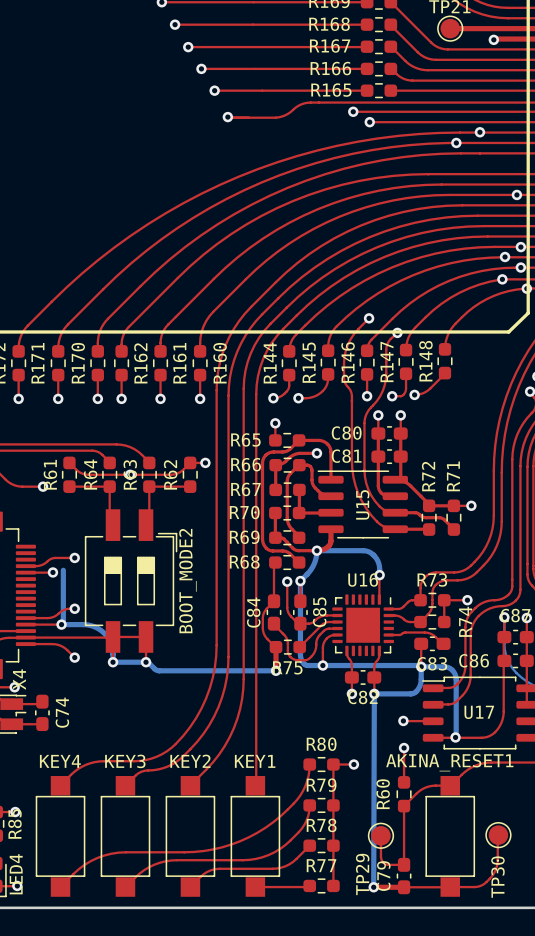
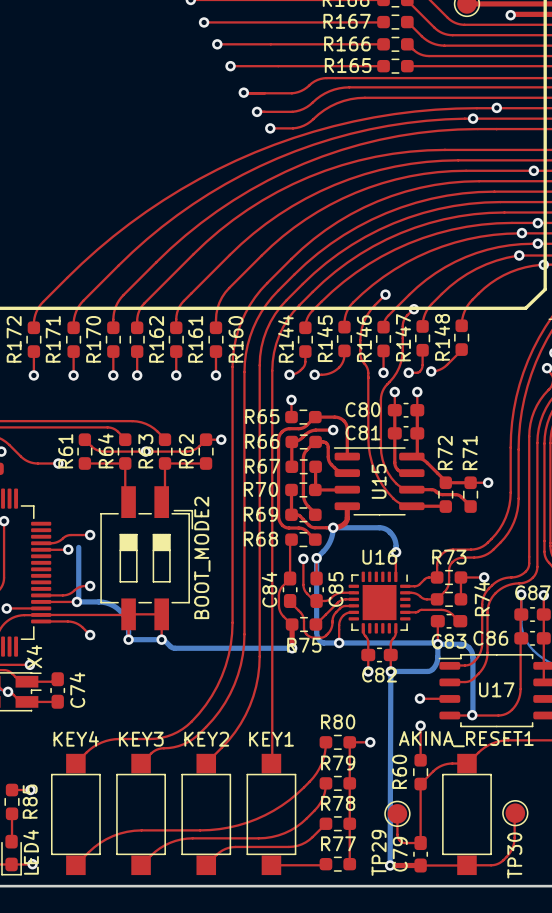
top track: none -> (369, 87) (334, 89) (320, 96) (306, 107) (296, 111) (257, 111)
via: (353, 111) -> none
top track: none -> (386, 97) (357, 98) (343, 100) (324, 110) (300, 126) (270, 128)
via: (369, 122) -> none
via: none -> (257, 111)
via: none -> (270, 128)

